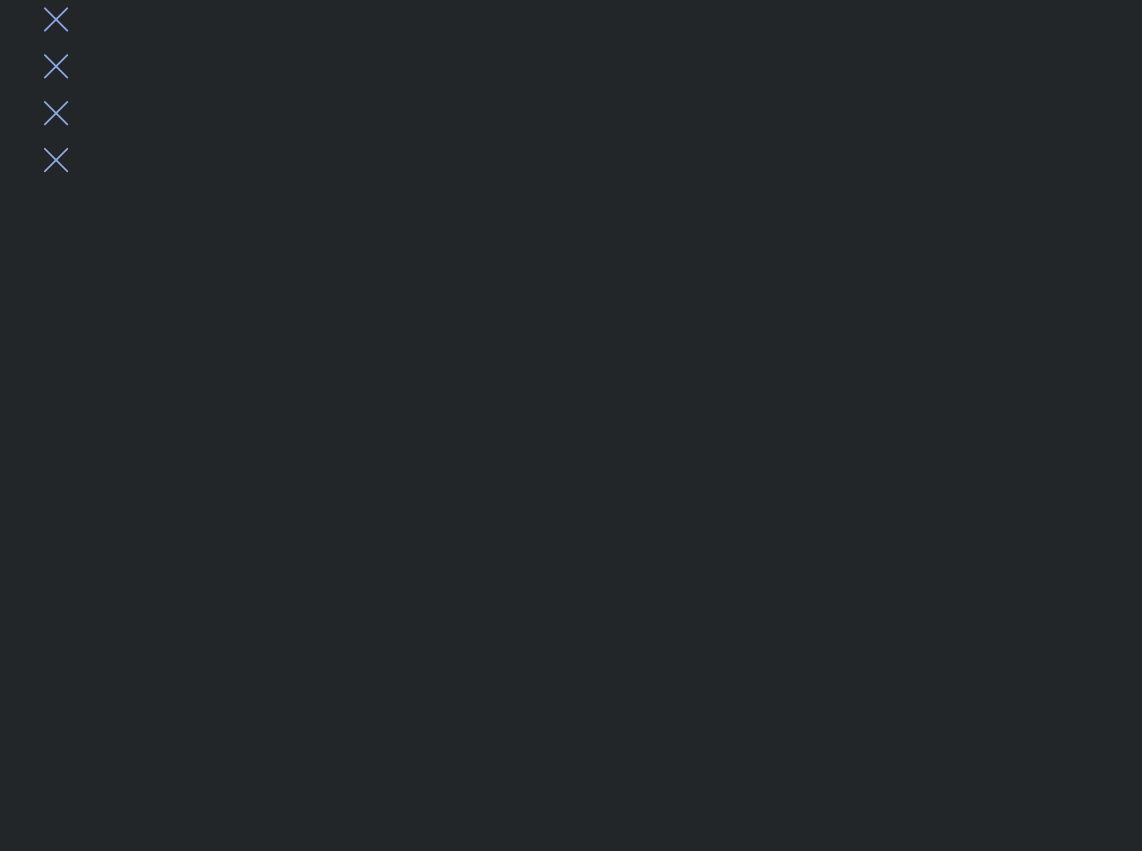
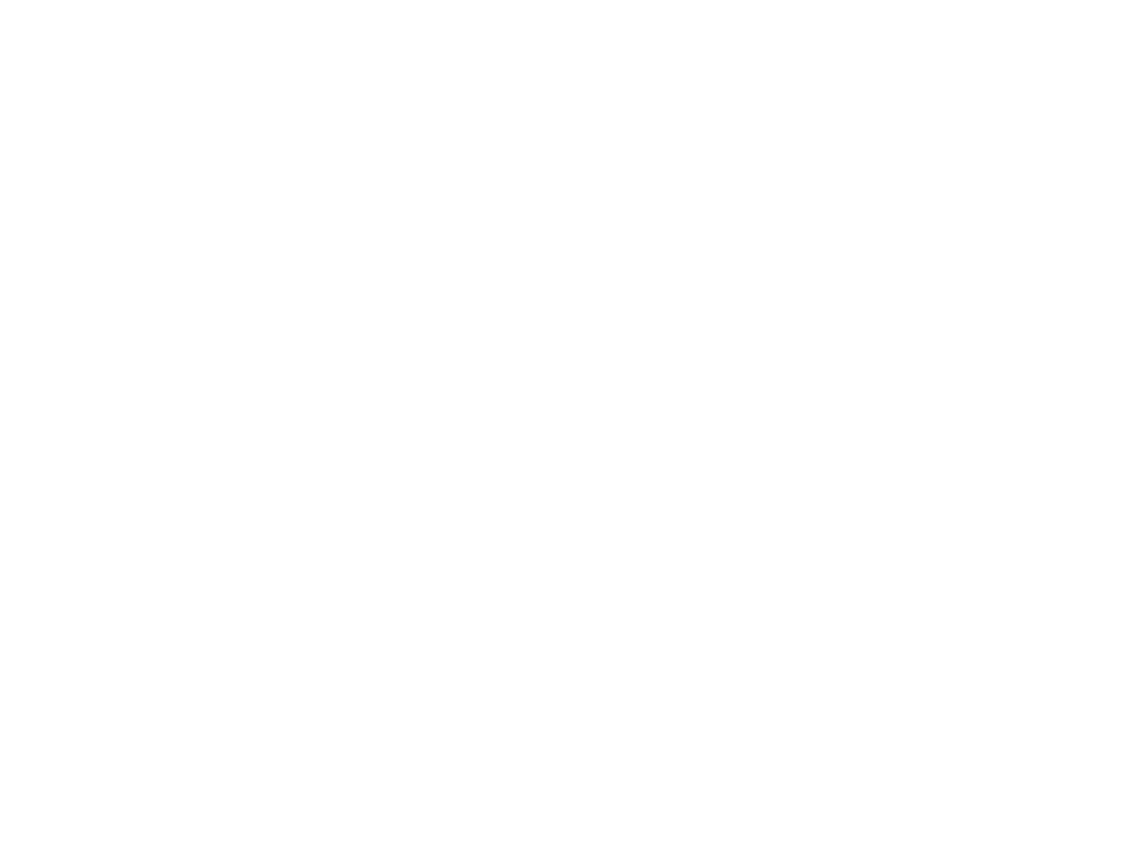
no-connect mark: (56, 19) -> none
no-connect mark: (56, 66) -> none
no-connect mark: (56, 113) -> none
no-connect mark: (56, 160) -> none

